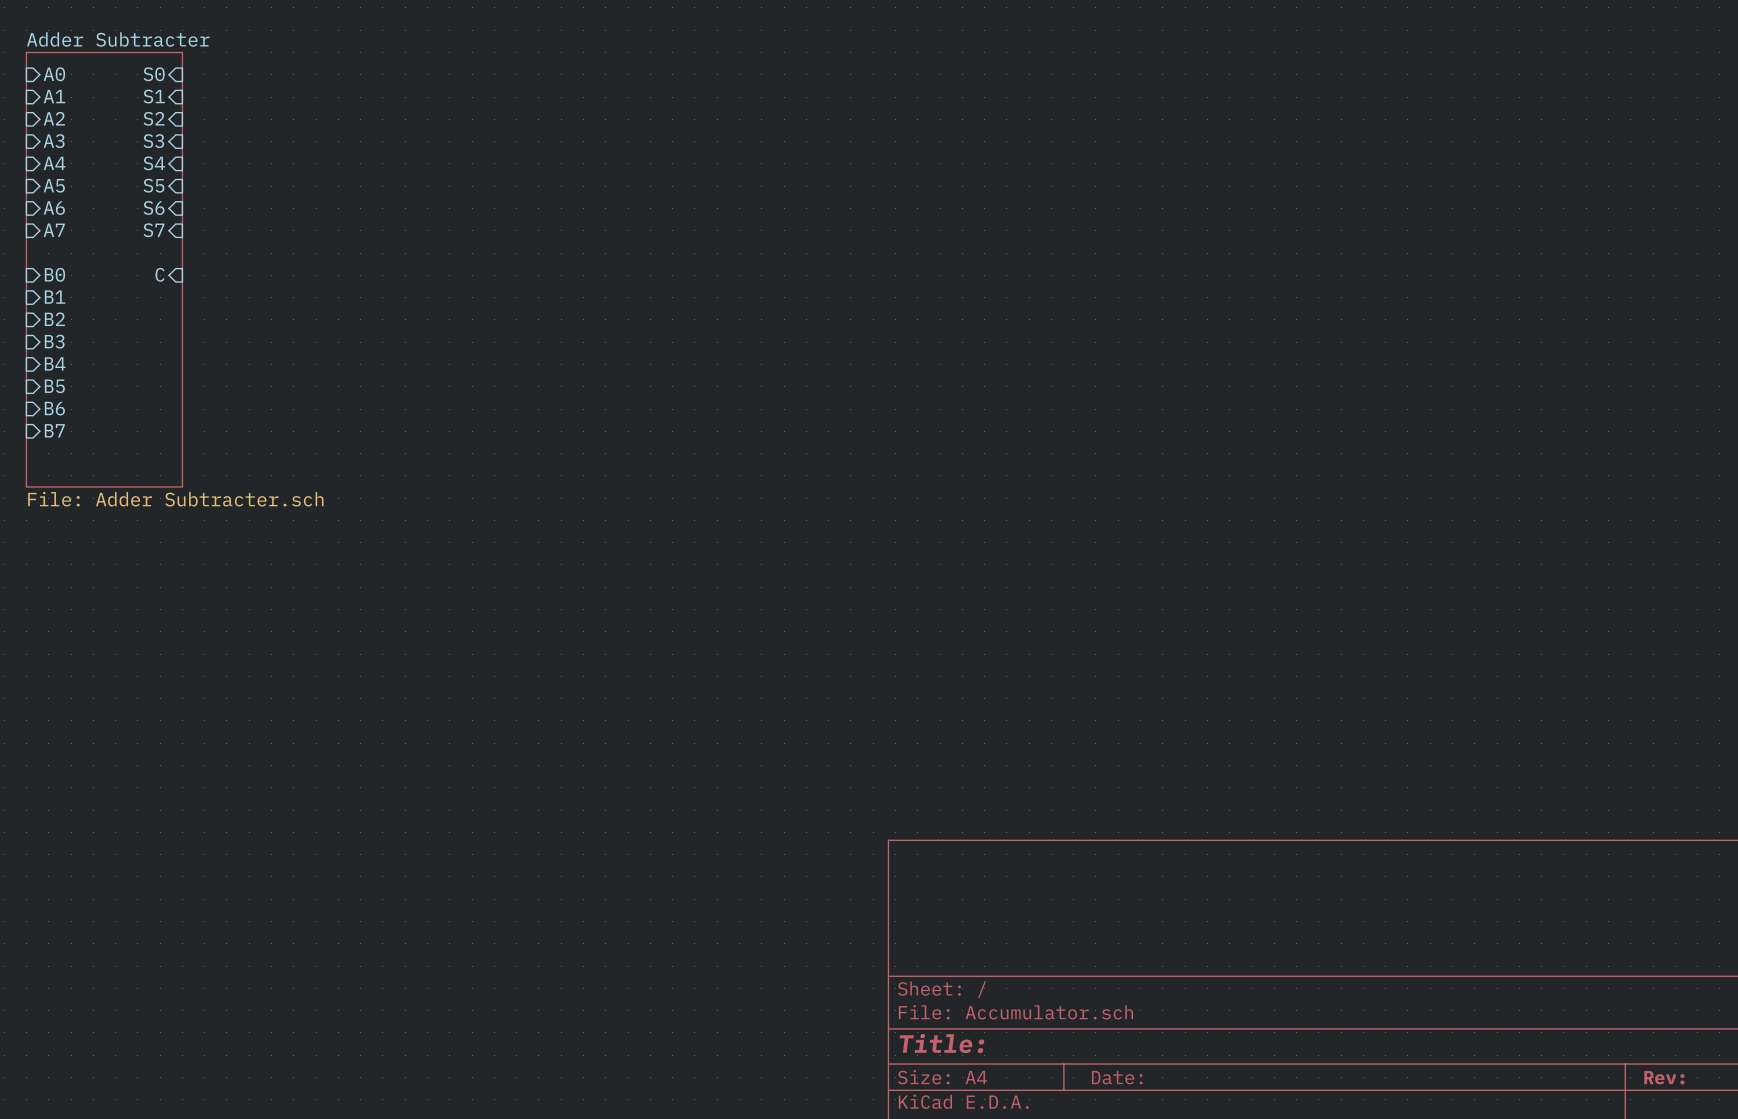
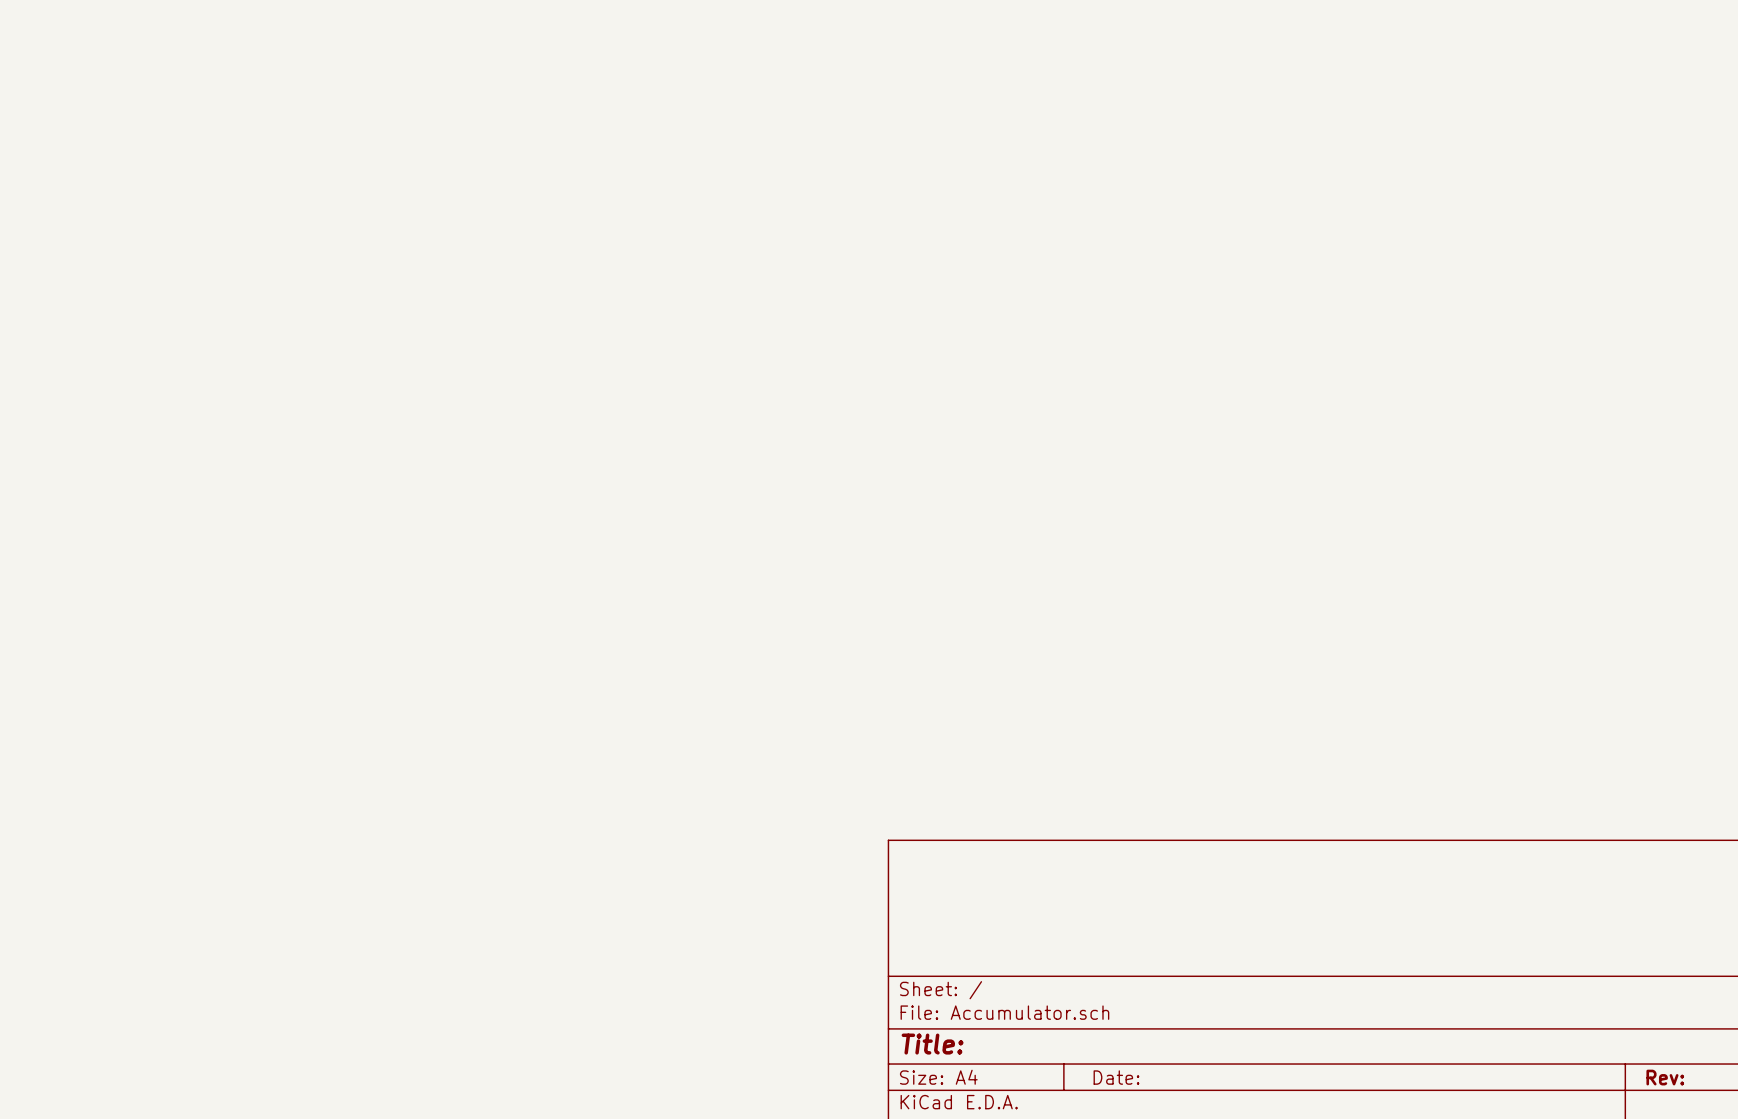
sheet pin: A0 (54, 74) -> none
sheet pin: S0 (154, 74) -> none
sheet pin: A1 (54, 96) -> none
sheet pin: S1 (154, 96) -> none
sheet pin: A2 (54, 118) -> none
sheet pin: S2 (154, 118) -> none
sheet pin: A3 (54, 141) -> none
sheet pin: S3 (153, 141) -> none
sheet pin: A4 (54, 163) -> none
sheet pin: S4 (154, 163) -> none
sheet pin: A5 (54, 185) -> none
sheet pin: S5 (154, 185) -> none
sheet pin: S6 (154, 207) -> none
sheet pin: A6 (54, 208) -> none
sheet pin: A7 (54, 230) -> none
sheet pin: S7 (153, 230) -> none
sheet Adder Subtracter: File: Adder Subtracter.sch (104, 269) -> none
sheet pin: B0 (54, 274) -> none
sheet pin: C (160, 274) -> none
sheet pin: B1 (55, 297) -> none
sheet pin: B2 (54, 319) -> none
sheet pin: B3 (54, 341) -> none
sheet pin: B4 (55, 363) -> none
sheet pin: B5 (54, 386) -> none
sheet pin: B6 (54, 408) -> none
sheet pin: B7 (54, 430) -> none

